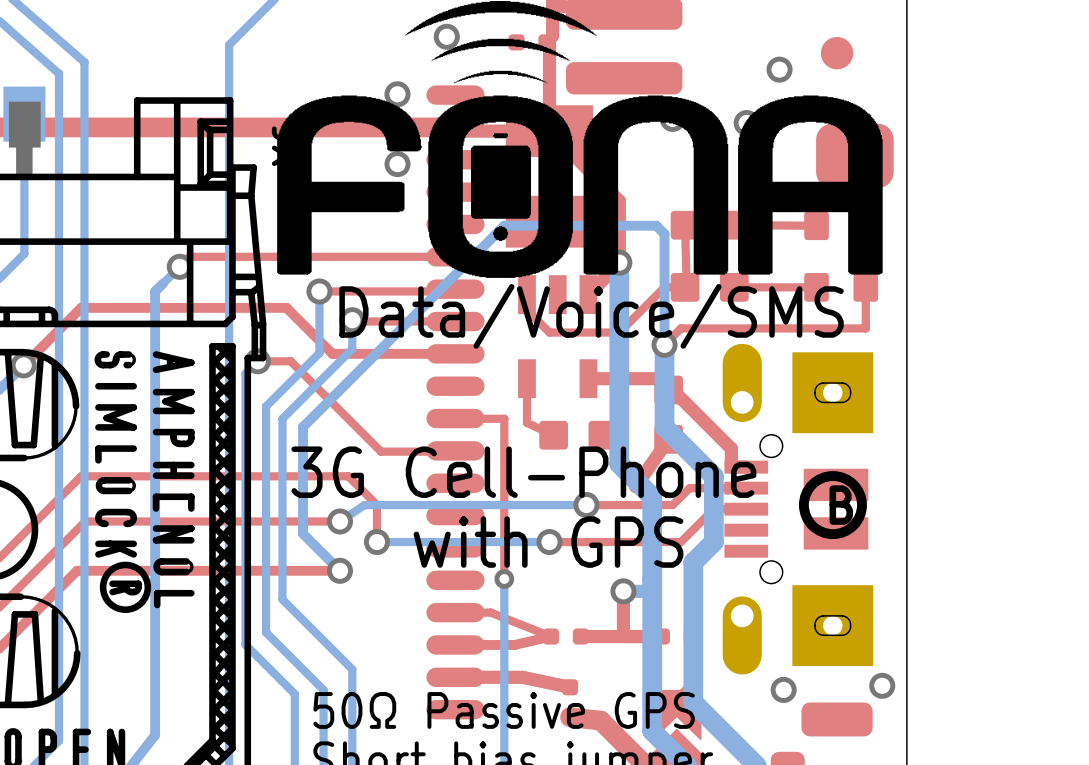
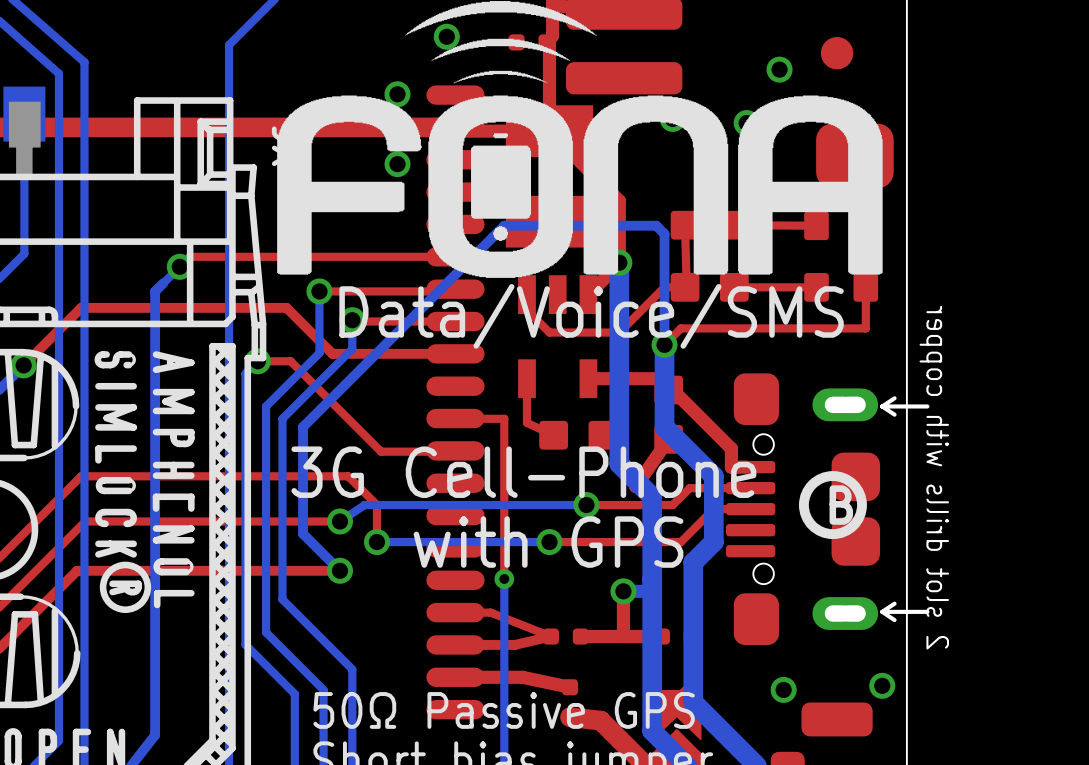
part footprint: [722, 343, 874, 675] -> [726, 373, 930, 646]

